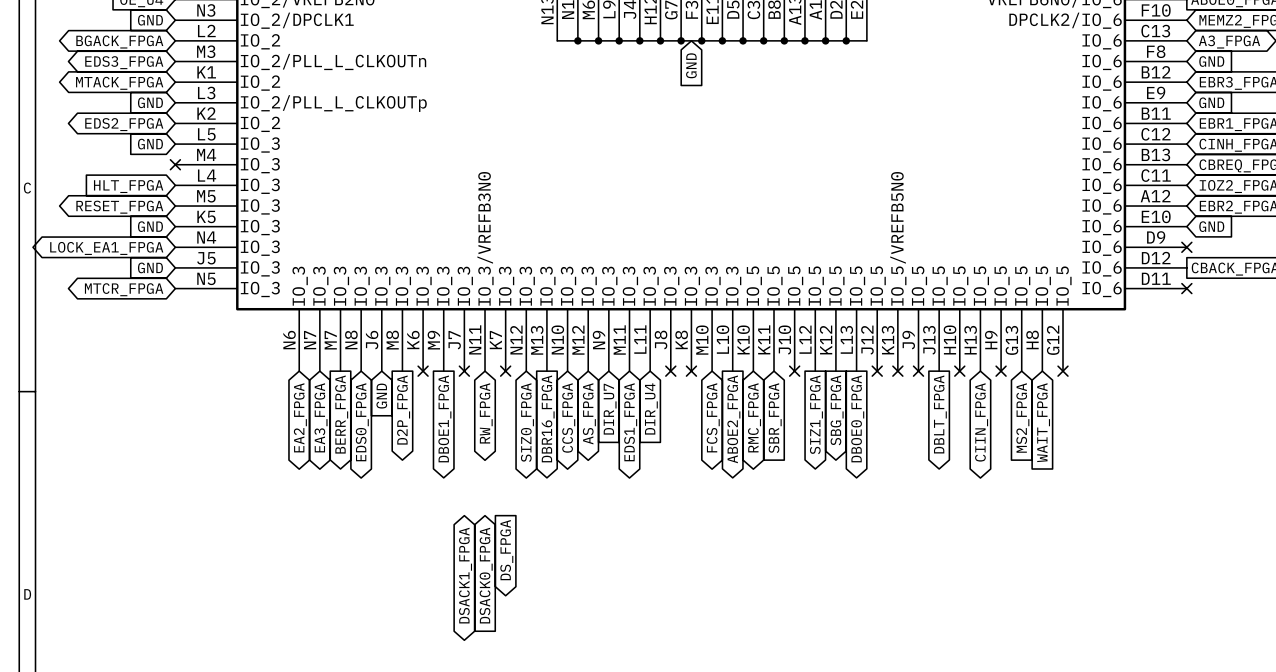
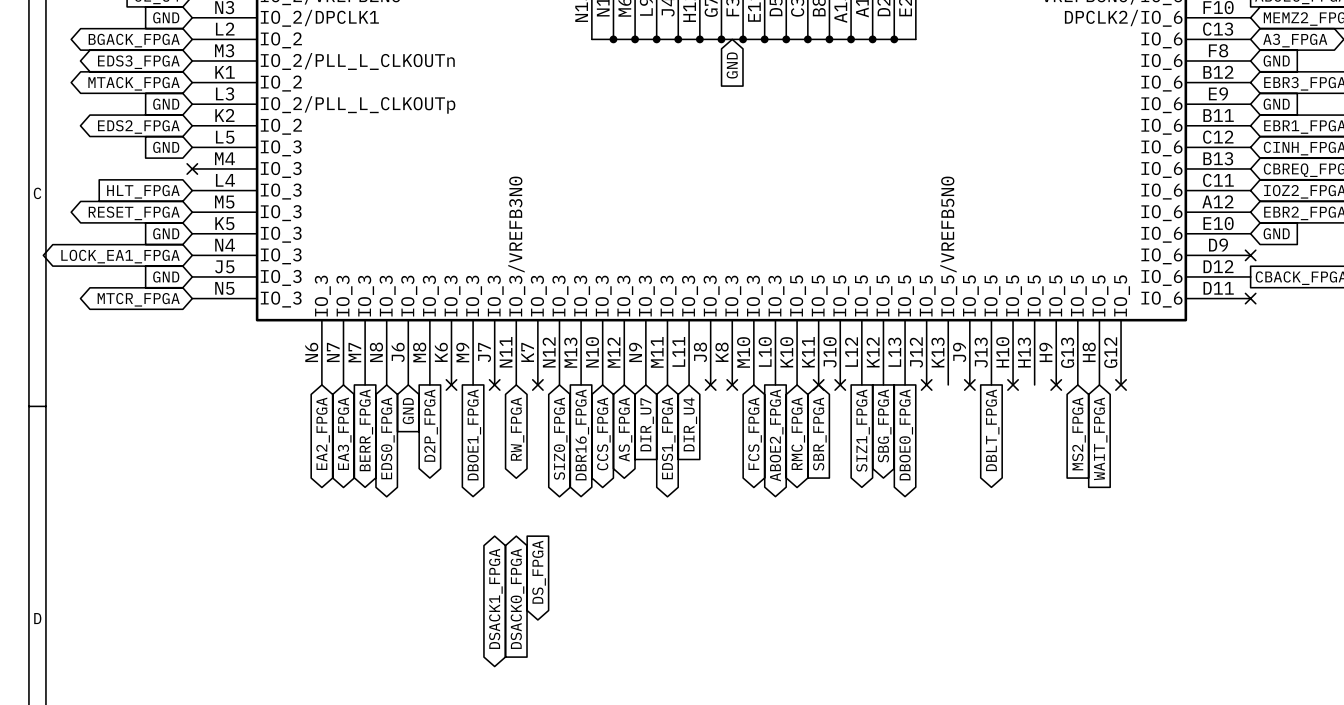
no-connect mark: none -> (818, 384)
no-connect mark: (897, 371) -> none
global label: CIIN_FPGA (981, 422) -> none

